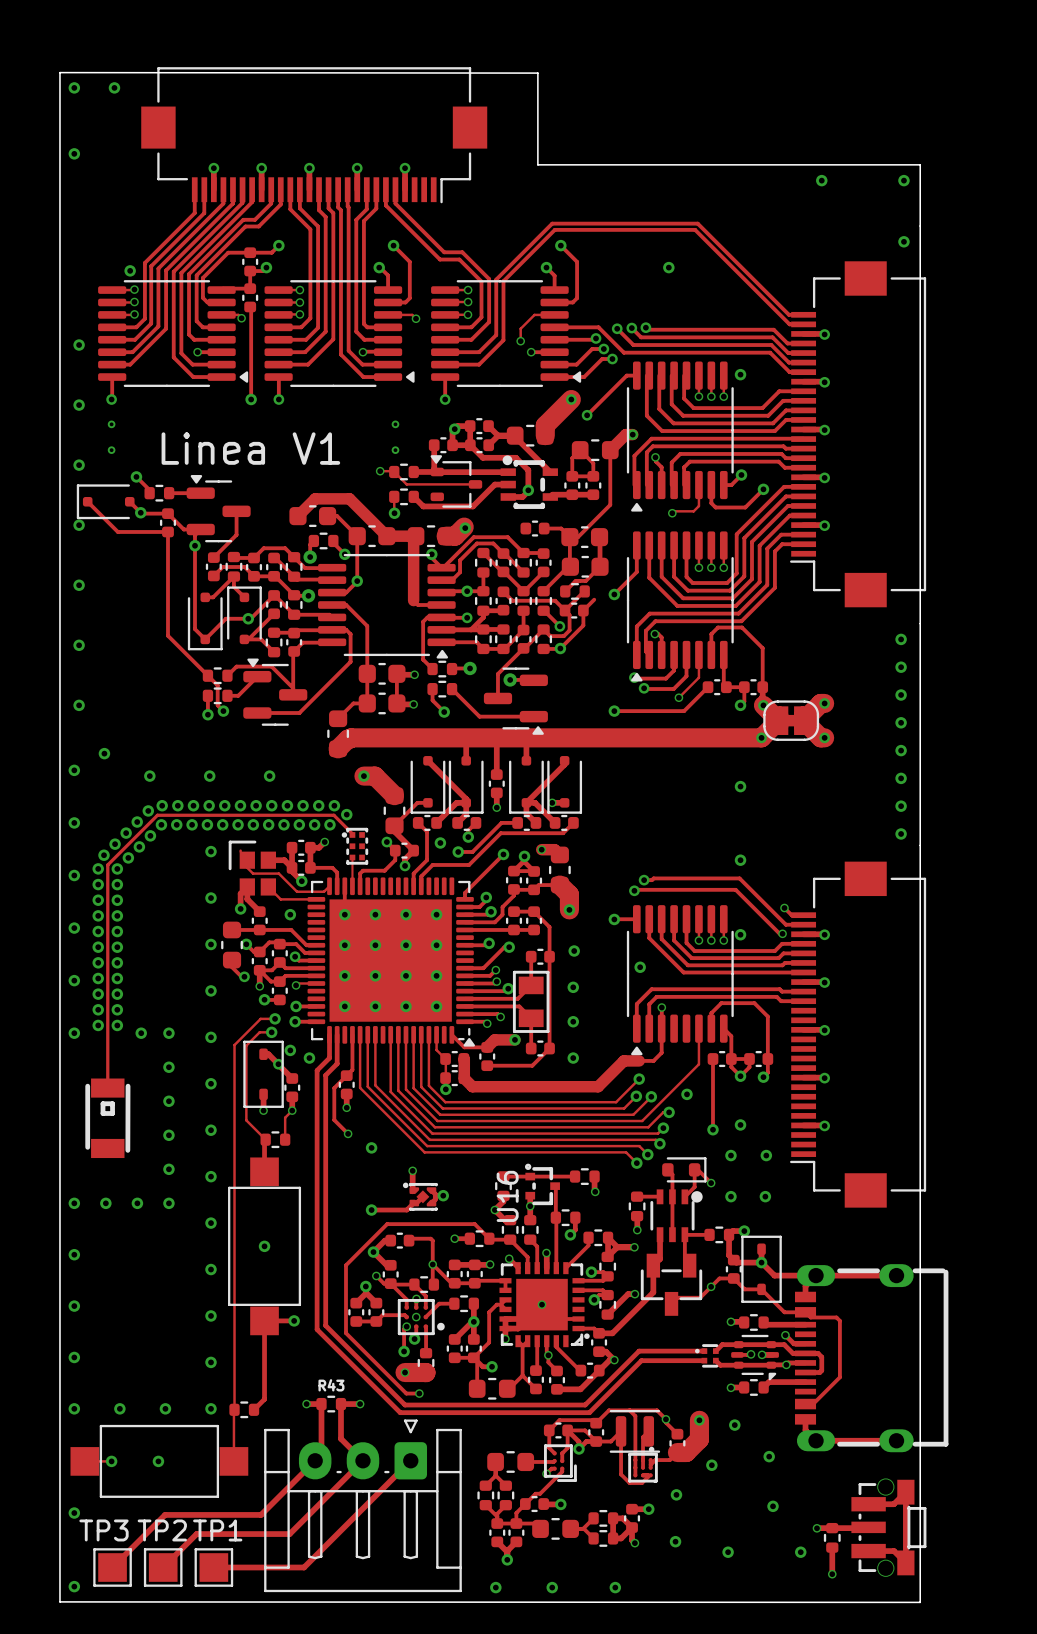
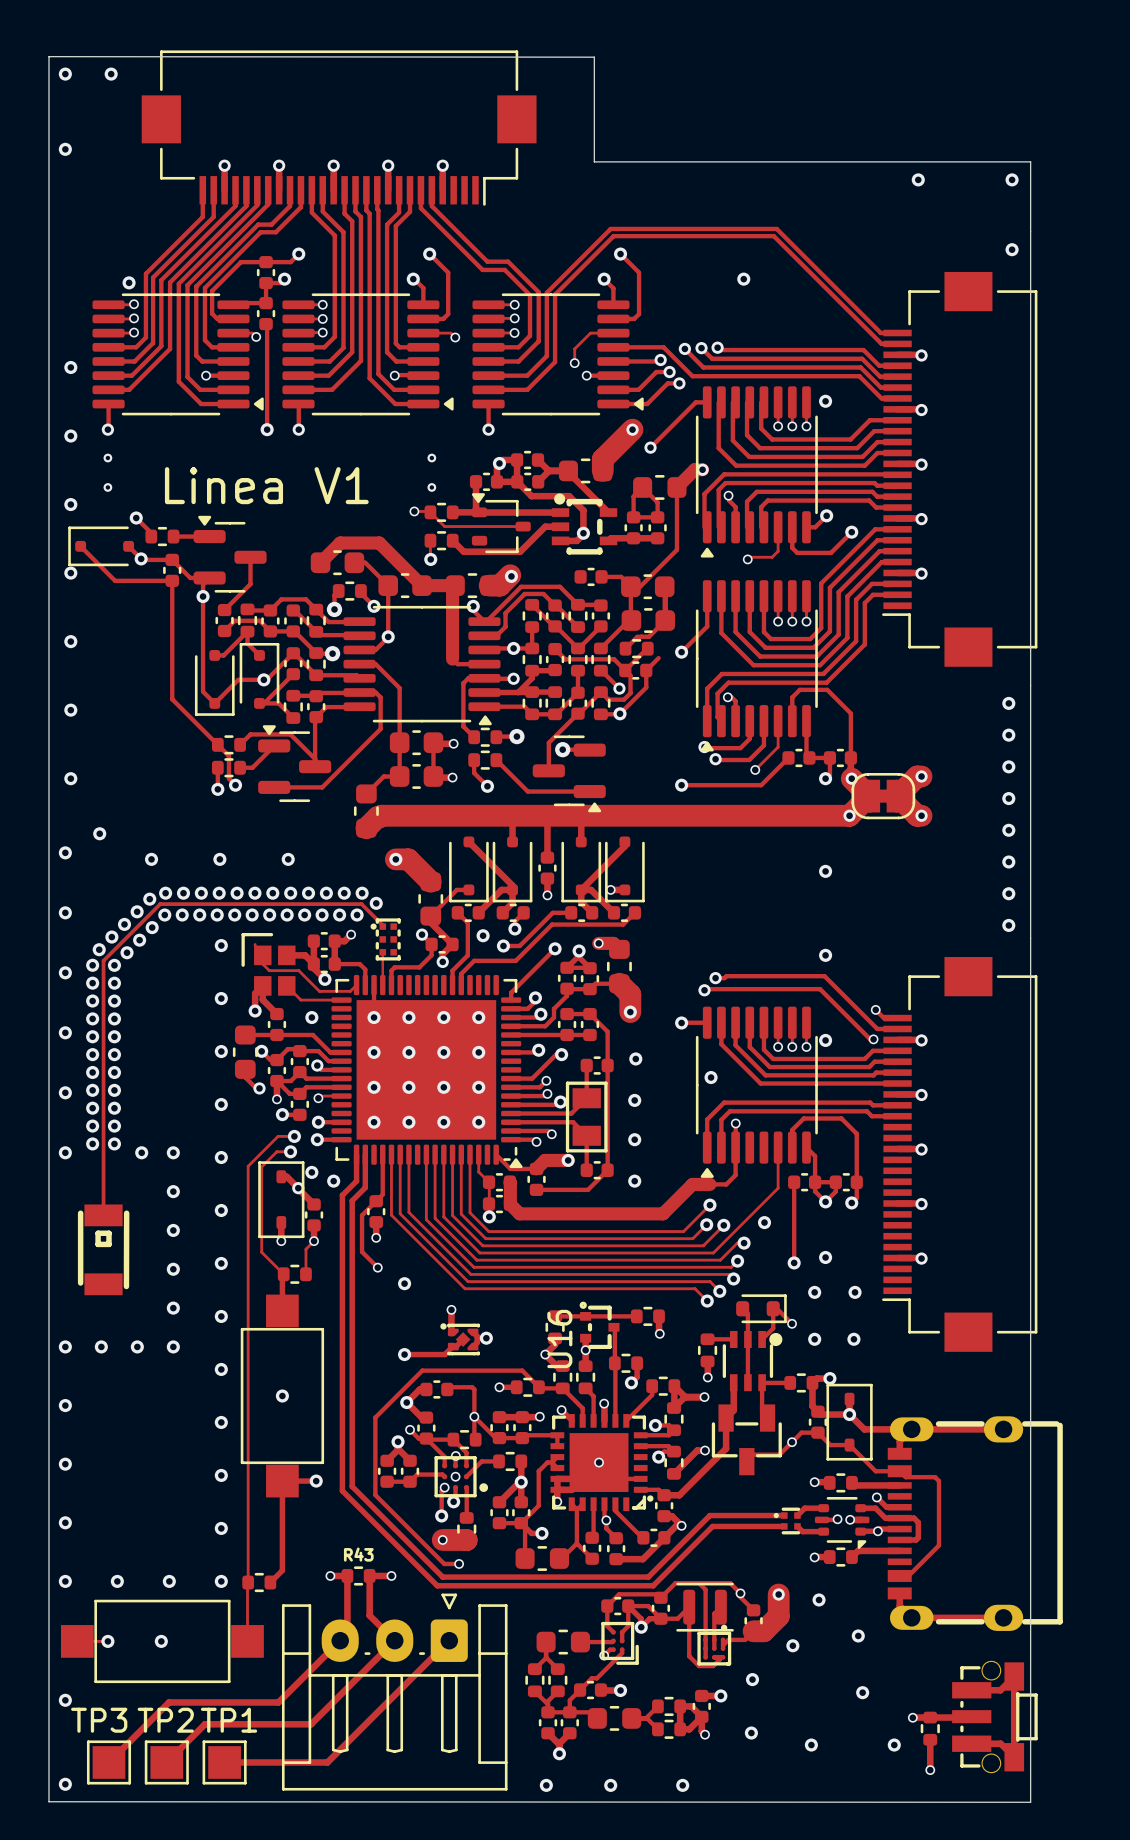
track: (738, 1344) (771, 1344) -> none
track: (738, 1365) (771, 1365) -> none

